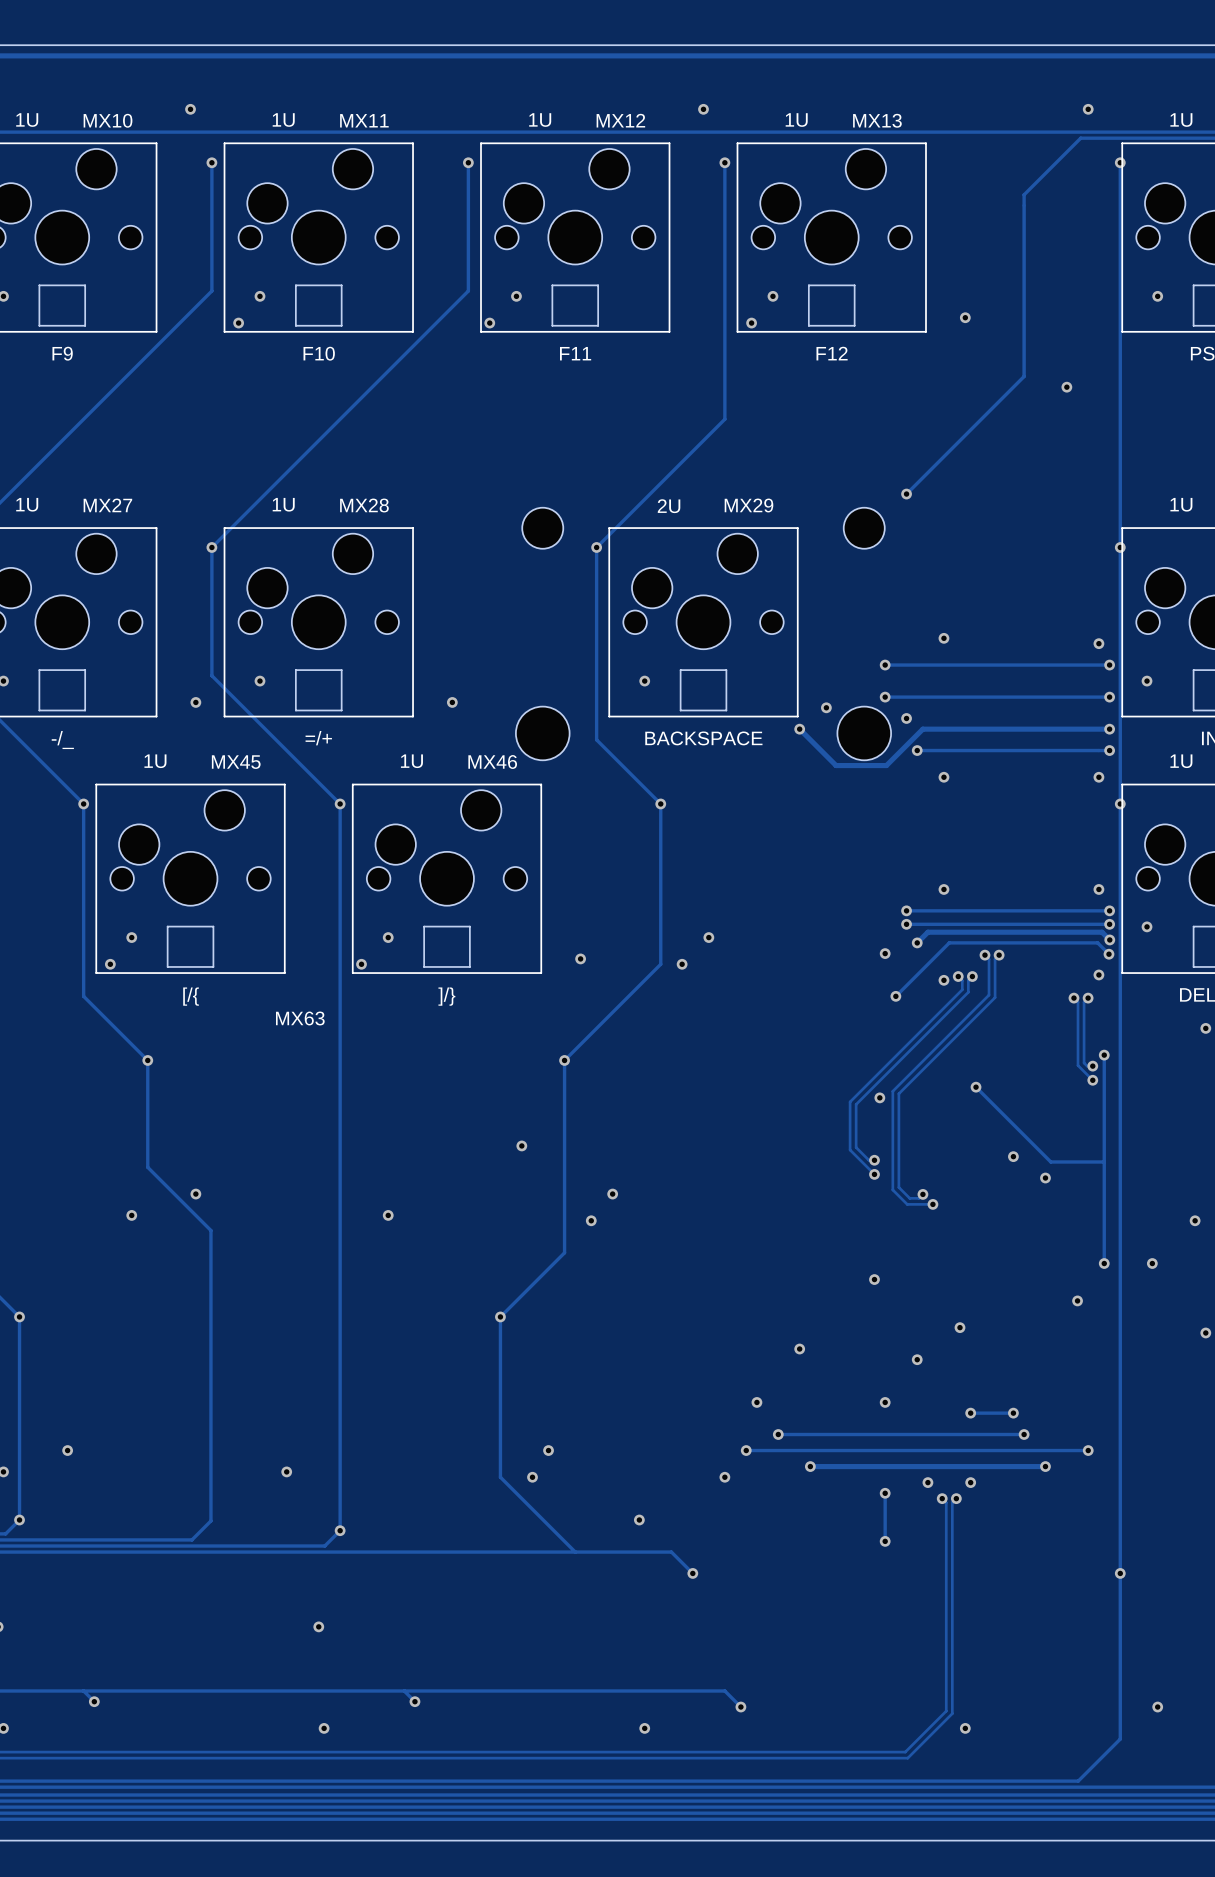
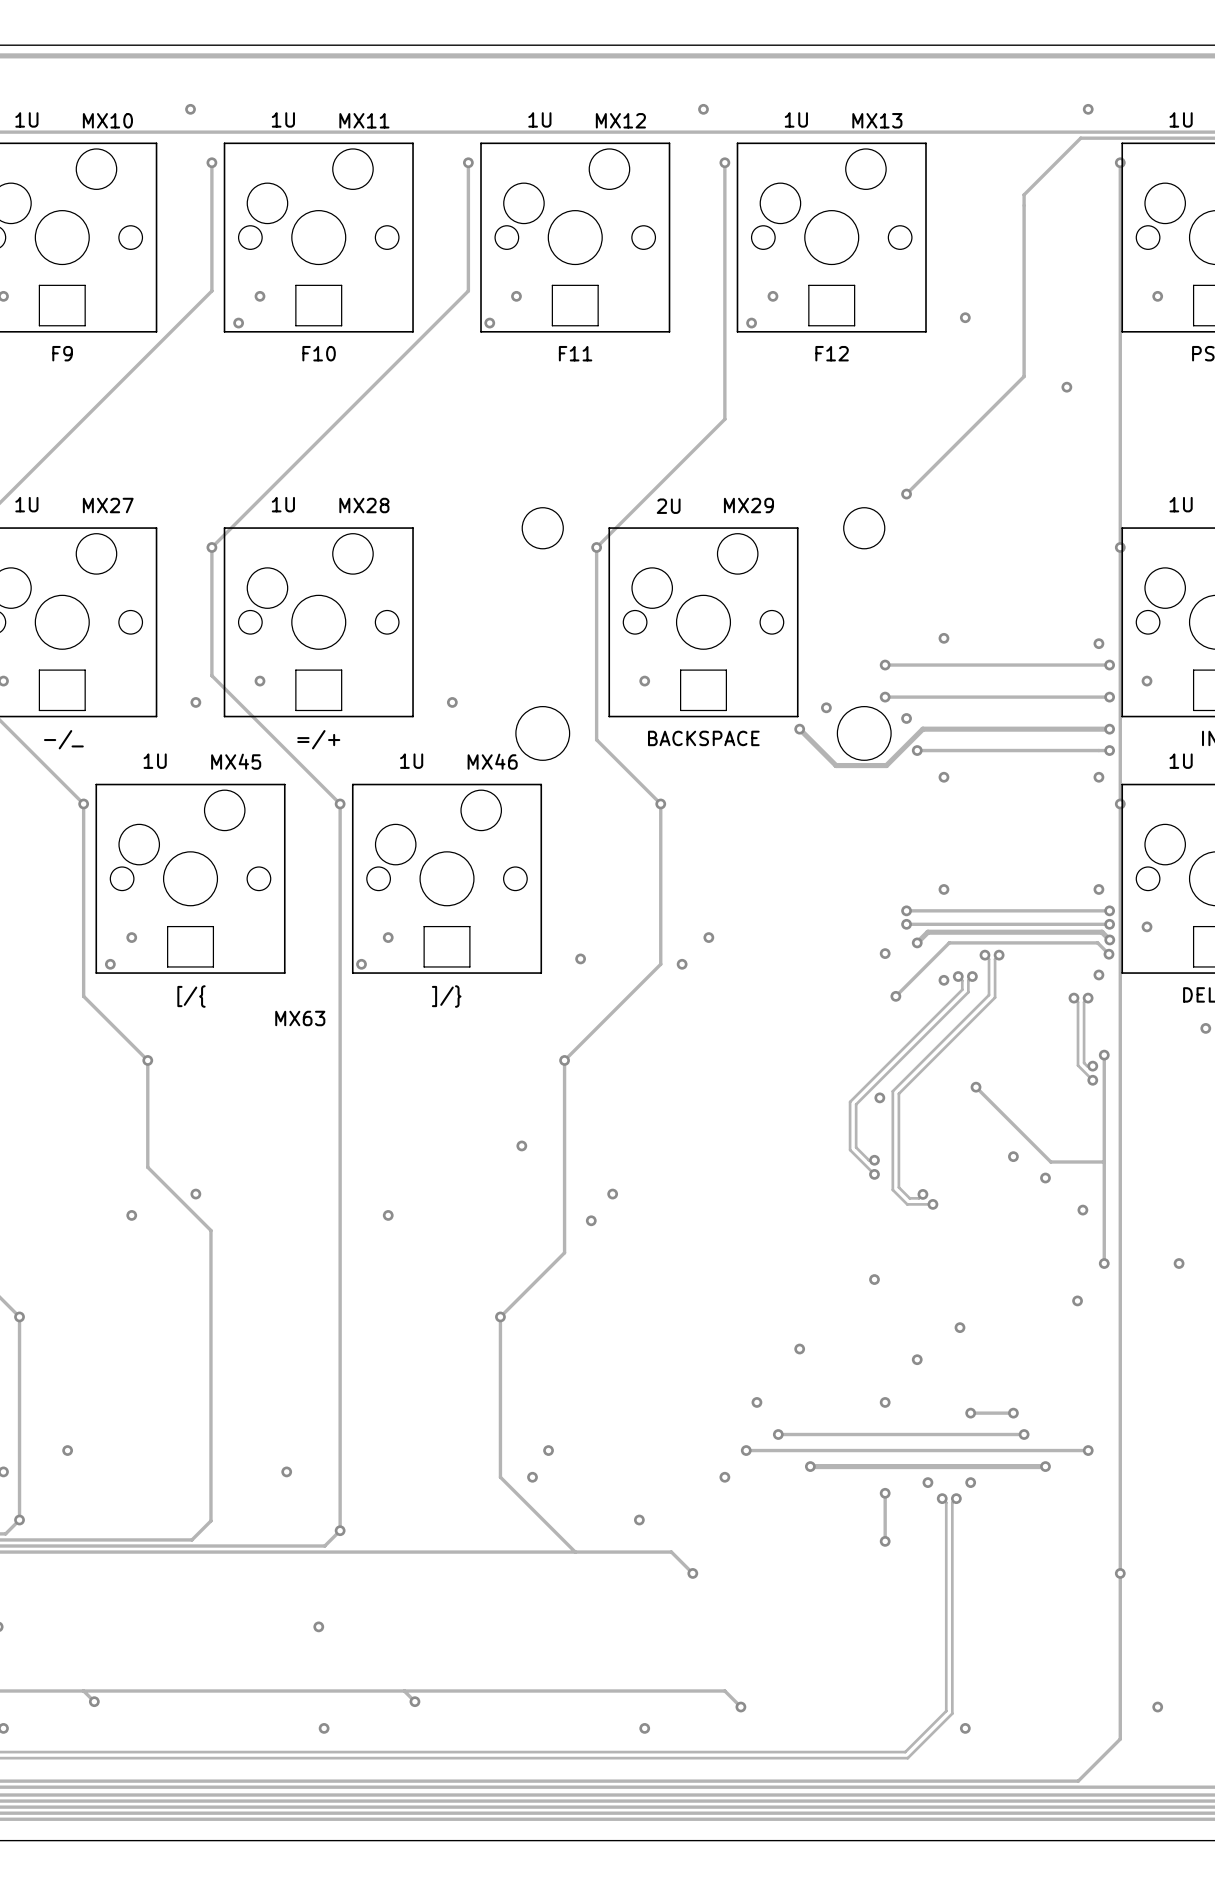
via: none -> (1082, 1210)
via: (1195, 1220) -> none
via: (1152, 1263) -> none
via: none -> (1179, 1263)
via: (1205, 1332) -> none

